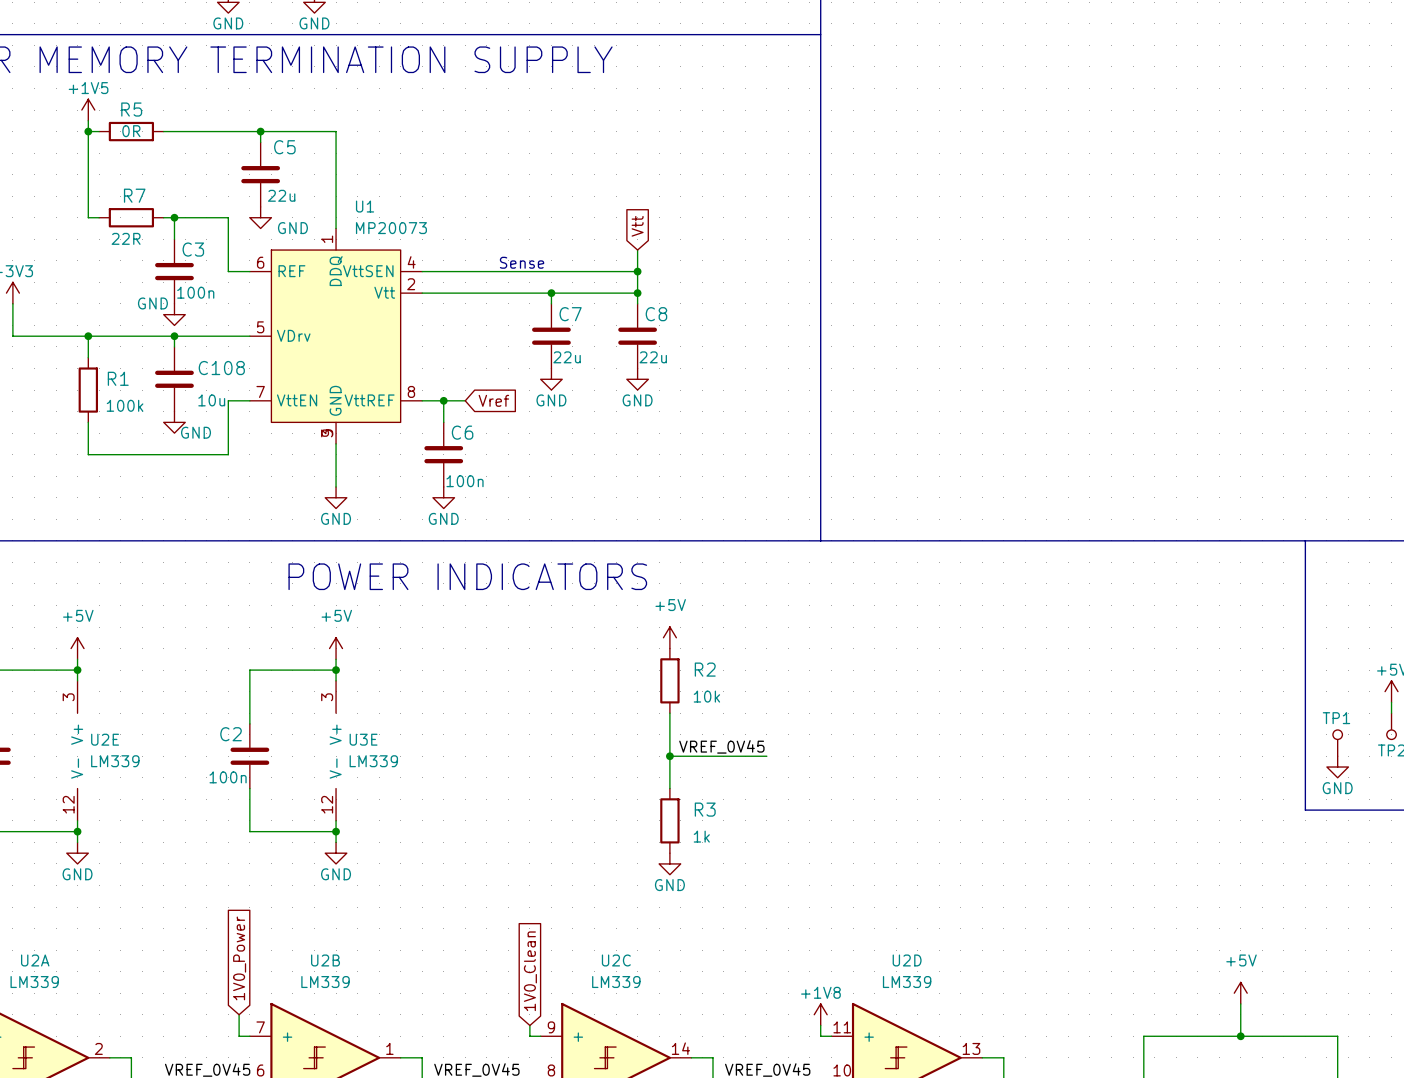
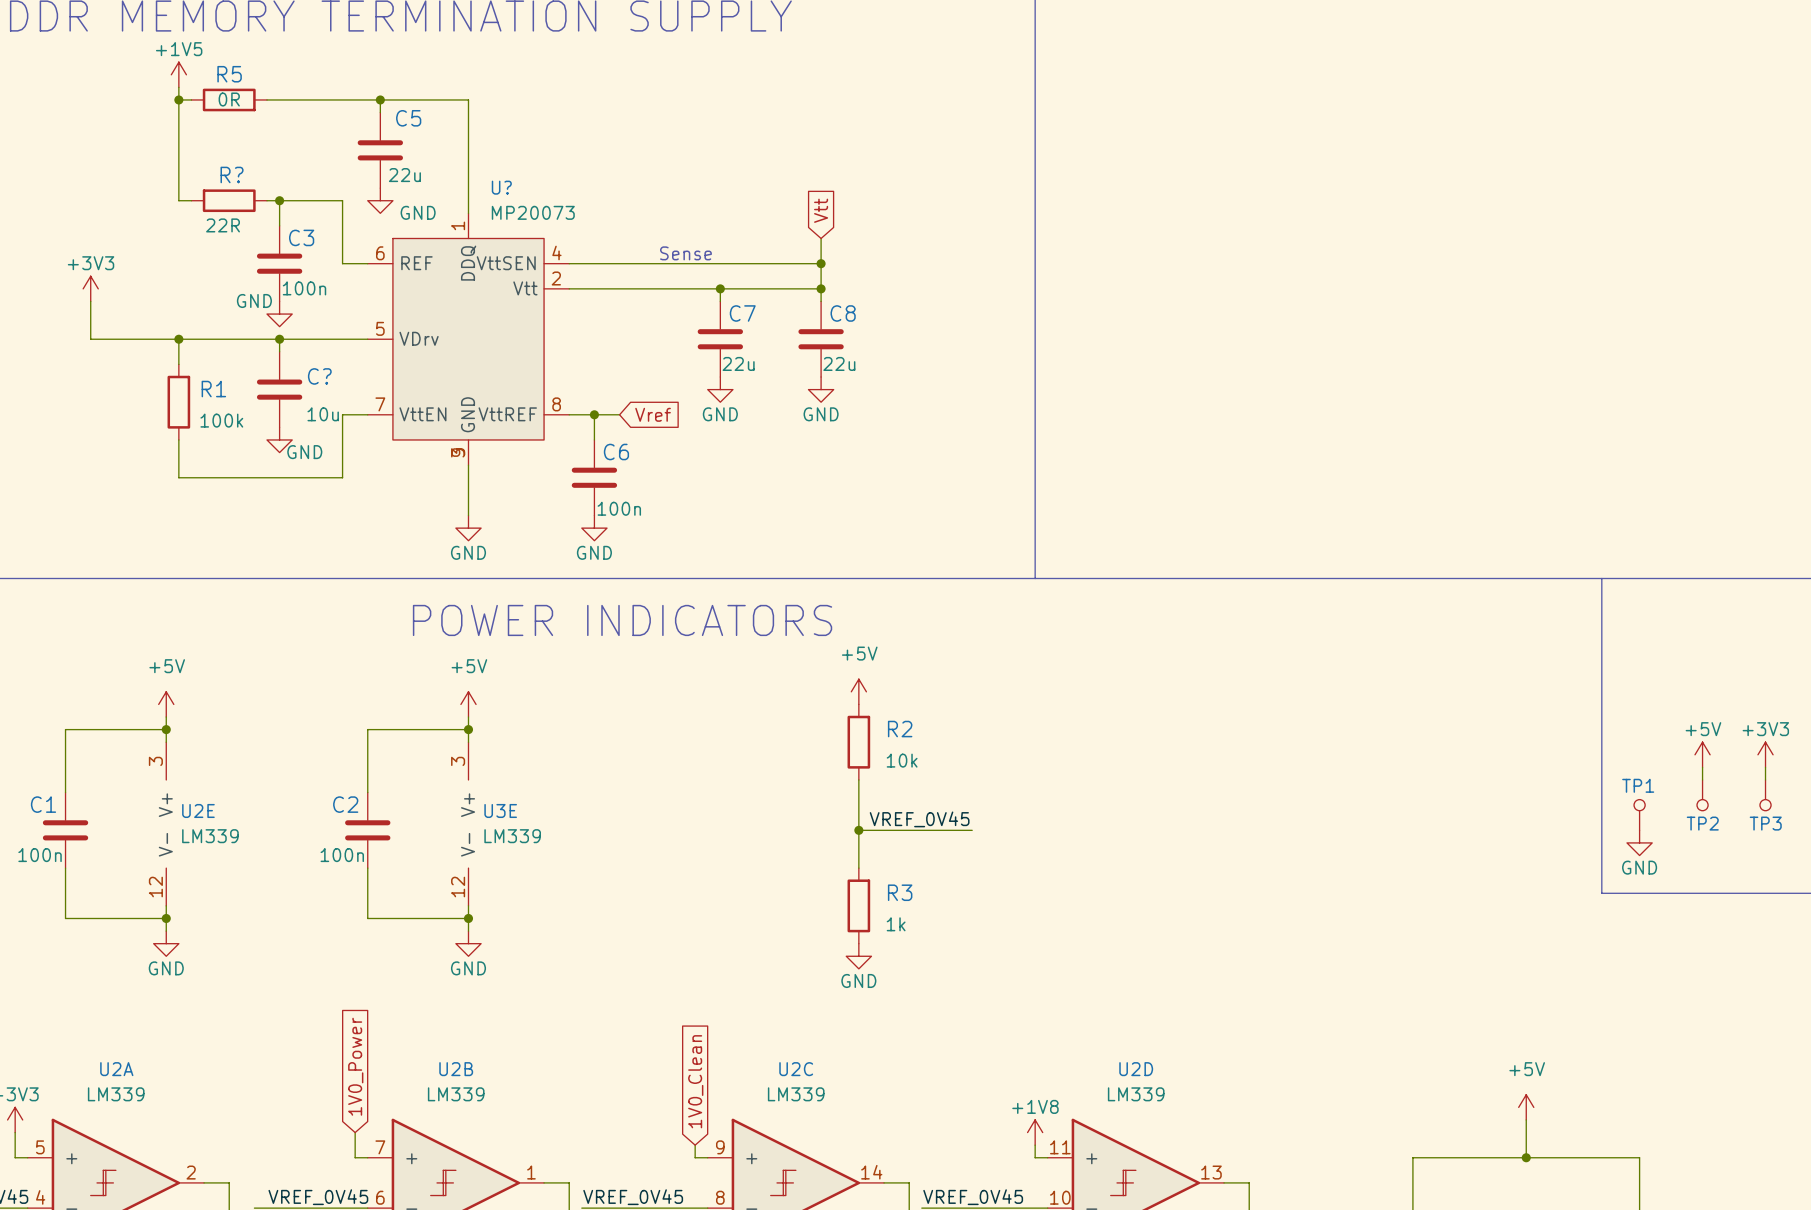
R7 name: R7 (134, 195) -> R? (232, 174)
U1 name: U1 (365, 206) -> U? (501, 187)
C108 name: C108 (221, 368) -> C? (319, 376)

